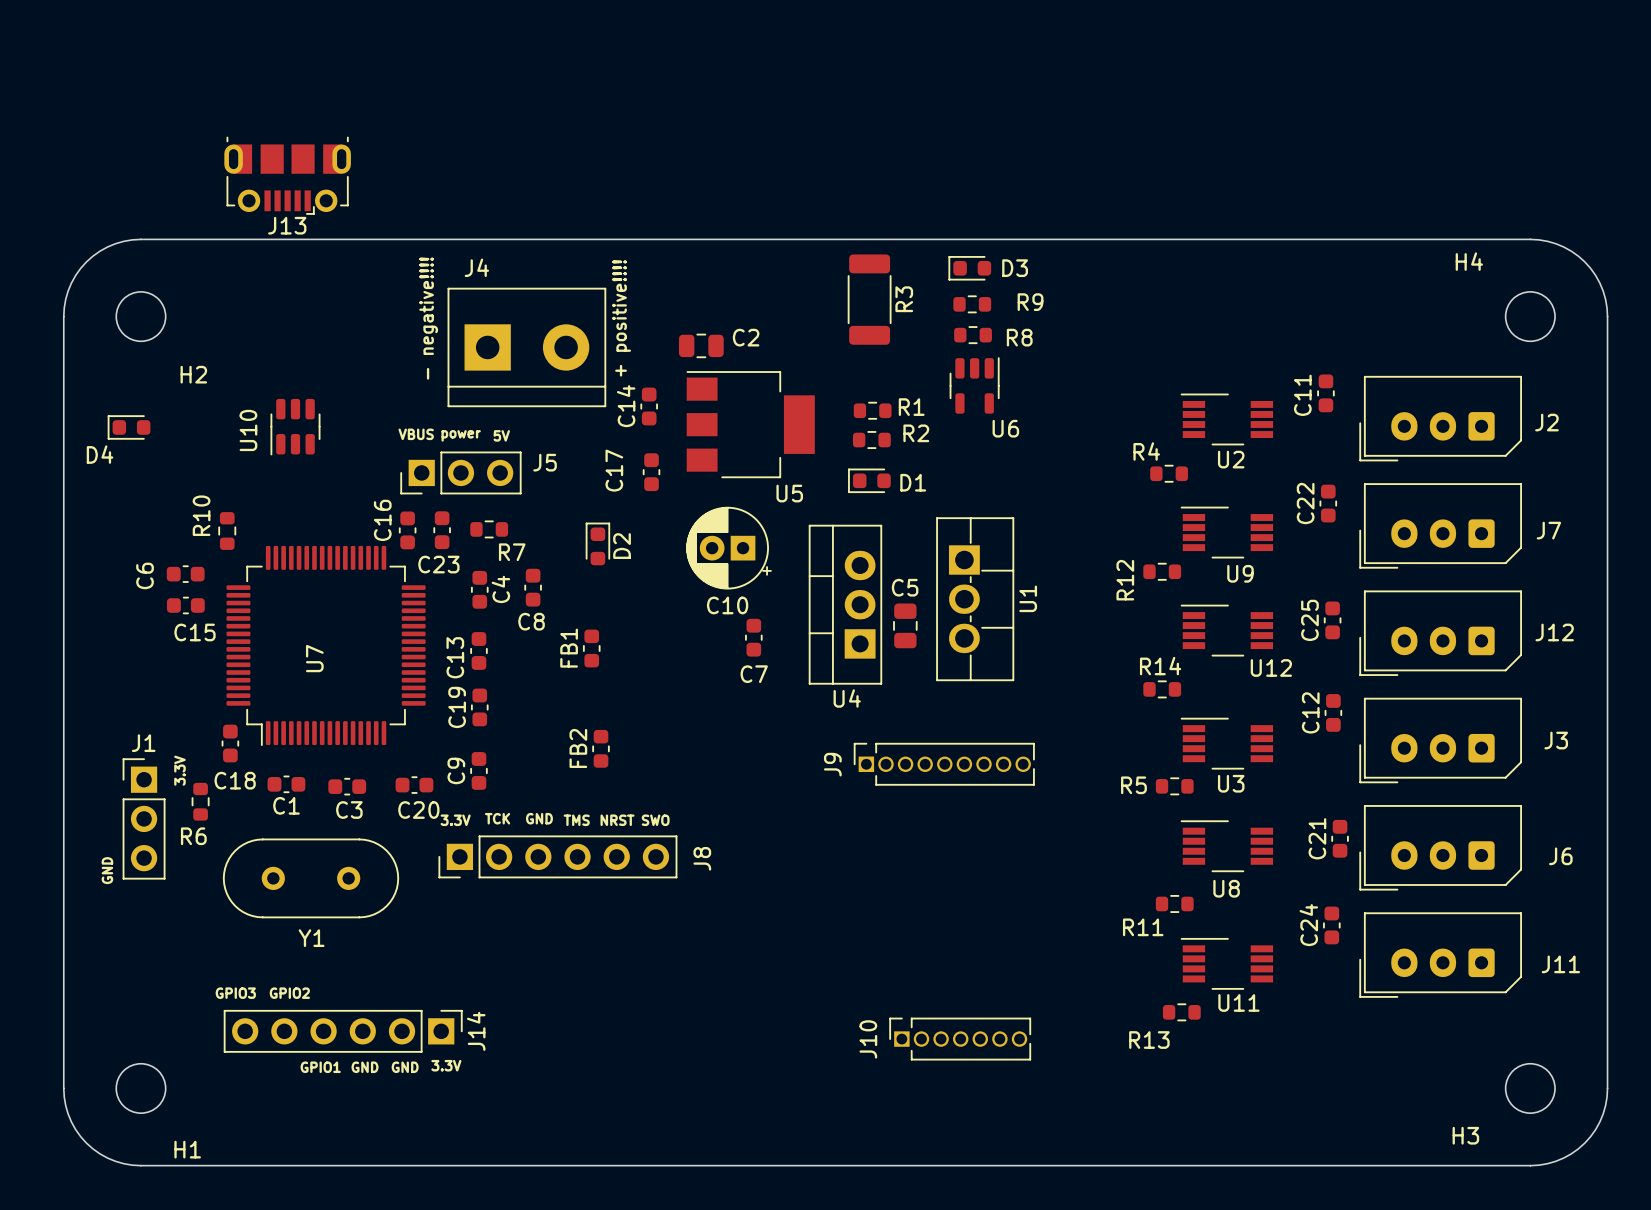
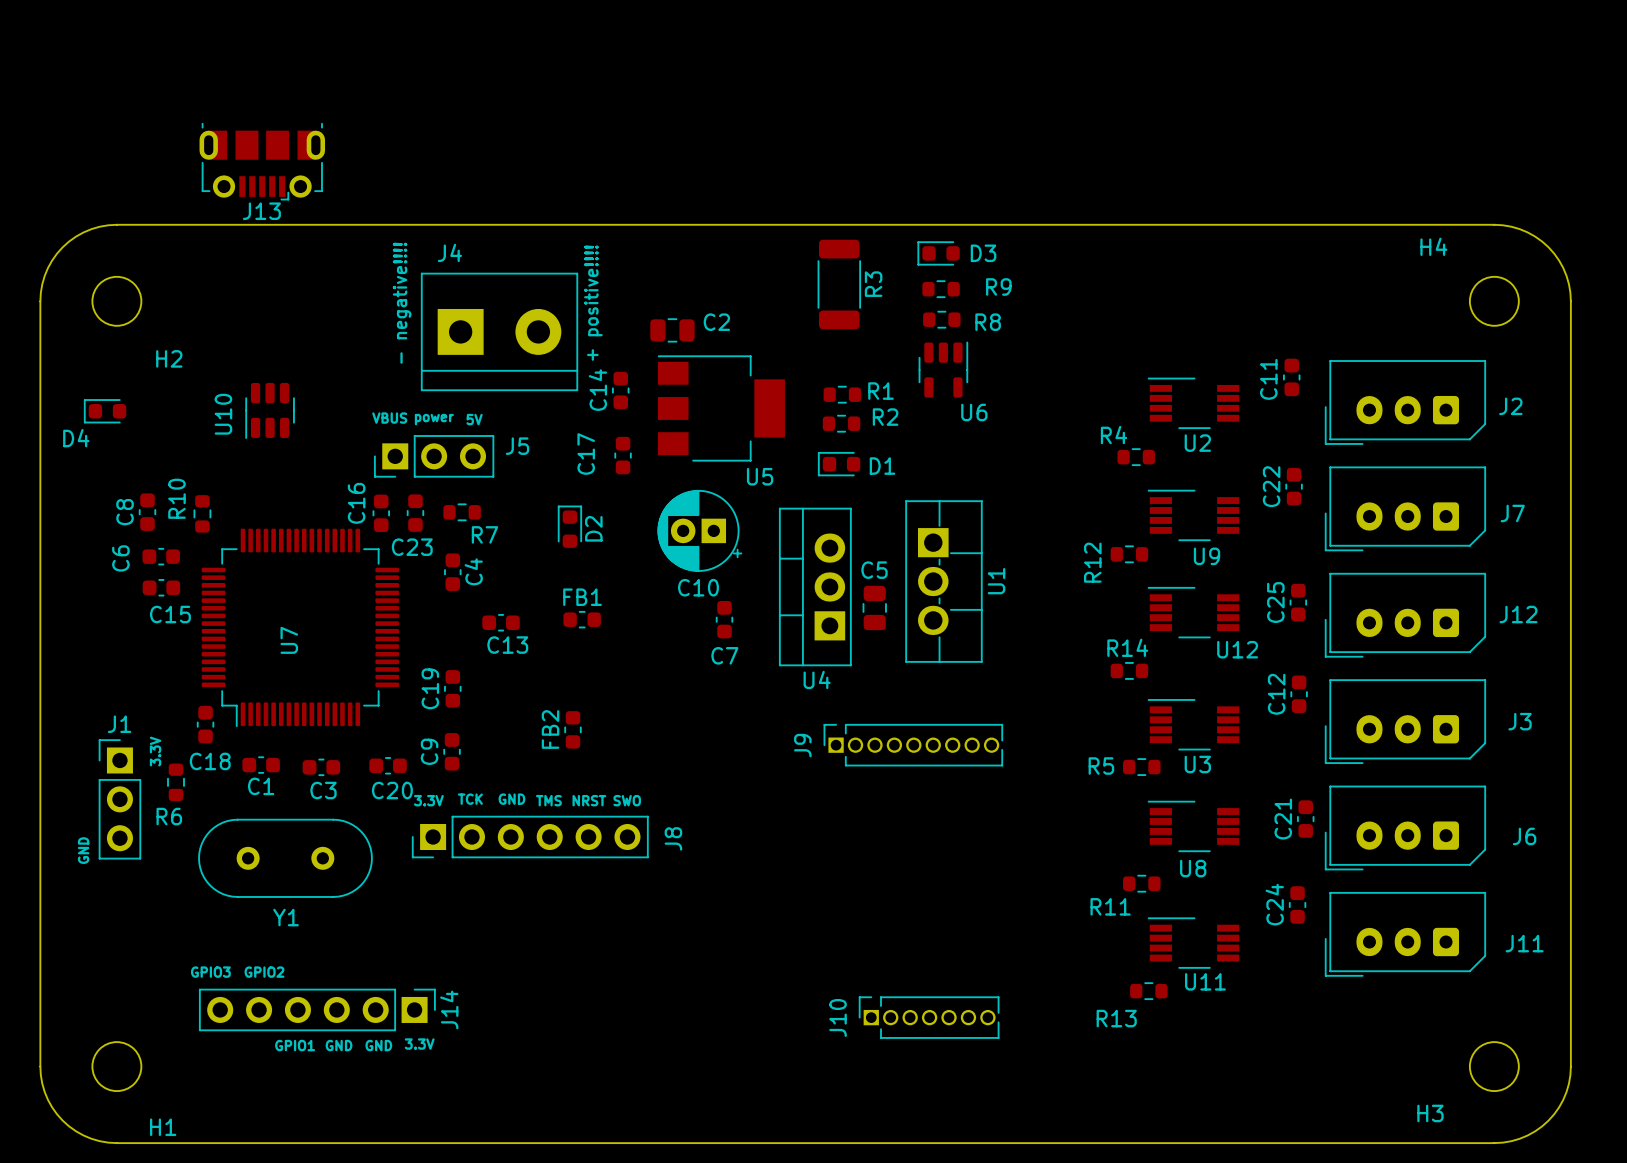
C8 position: (533, 587) -> (147, 512)
C8 name rotation: 0° (531, 621) -> 90° counterclockwise (125, 512)
C8 name position: C8 (531, 621) -> C8 (125, 512)
FB1 rotation: 0° (591, 648) -> 90° clockwise (582, 619)
C13 rotation: 0° (478, 650) -> 90° clockwise (501, 622)
C13 position: (478, 650) -> (501, 622)
C13 name position: C13 (455, 657) -> C13 (507, 645)

